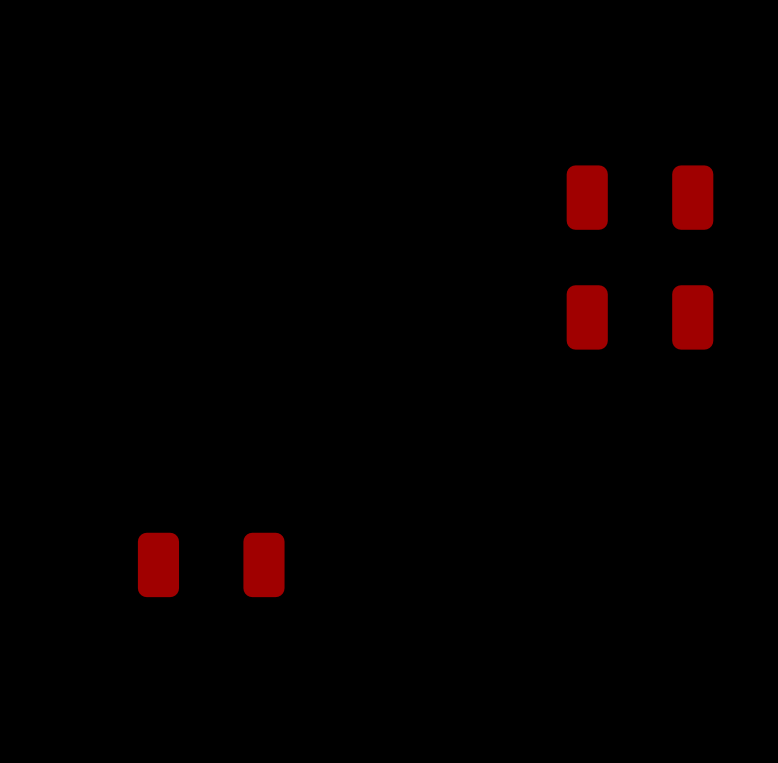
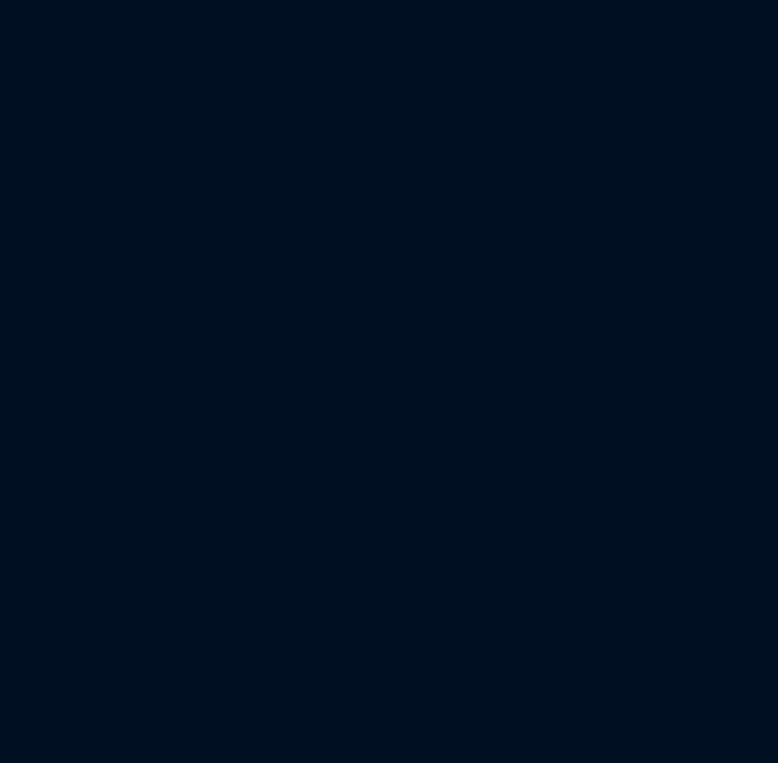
part: (639, 197) -> none
part: (639, 317) -> none
part: (211, 564) -> none

